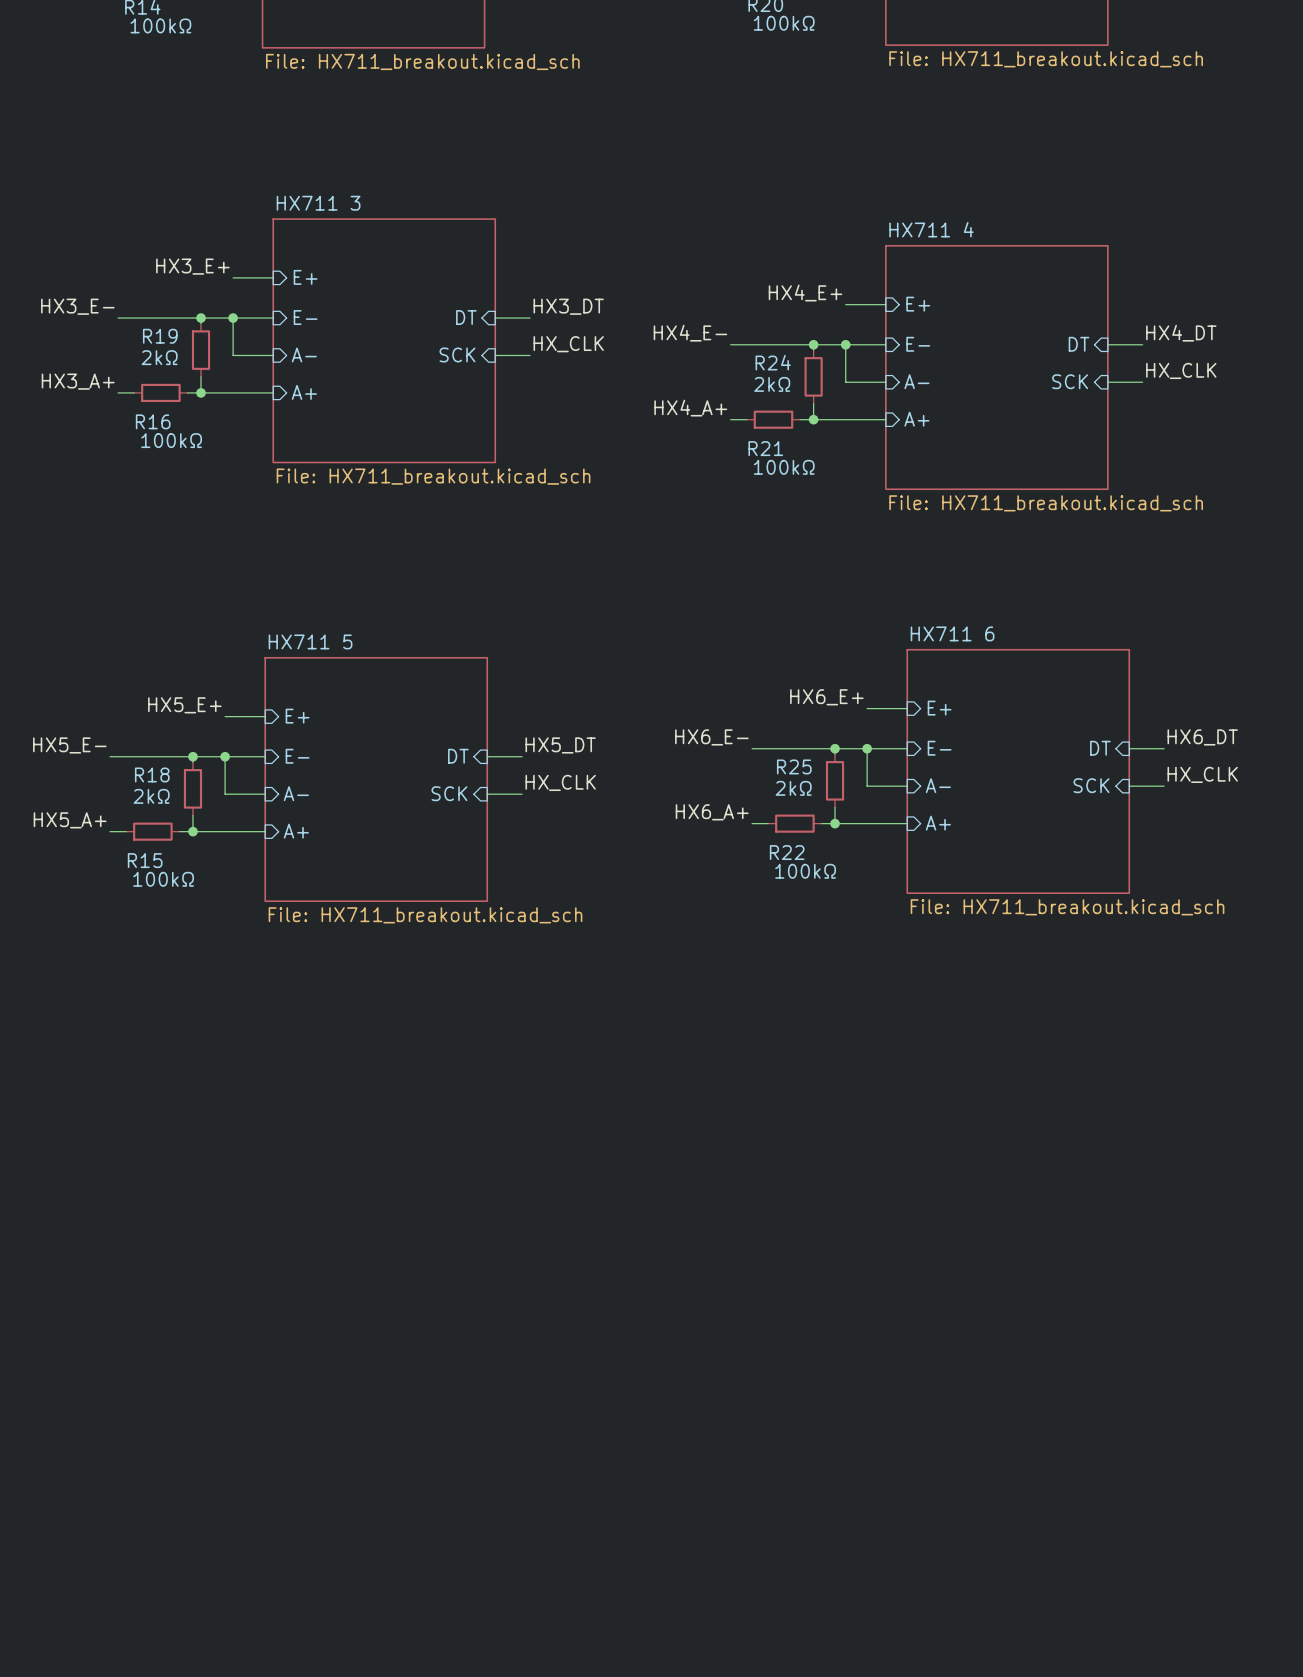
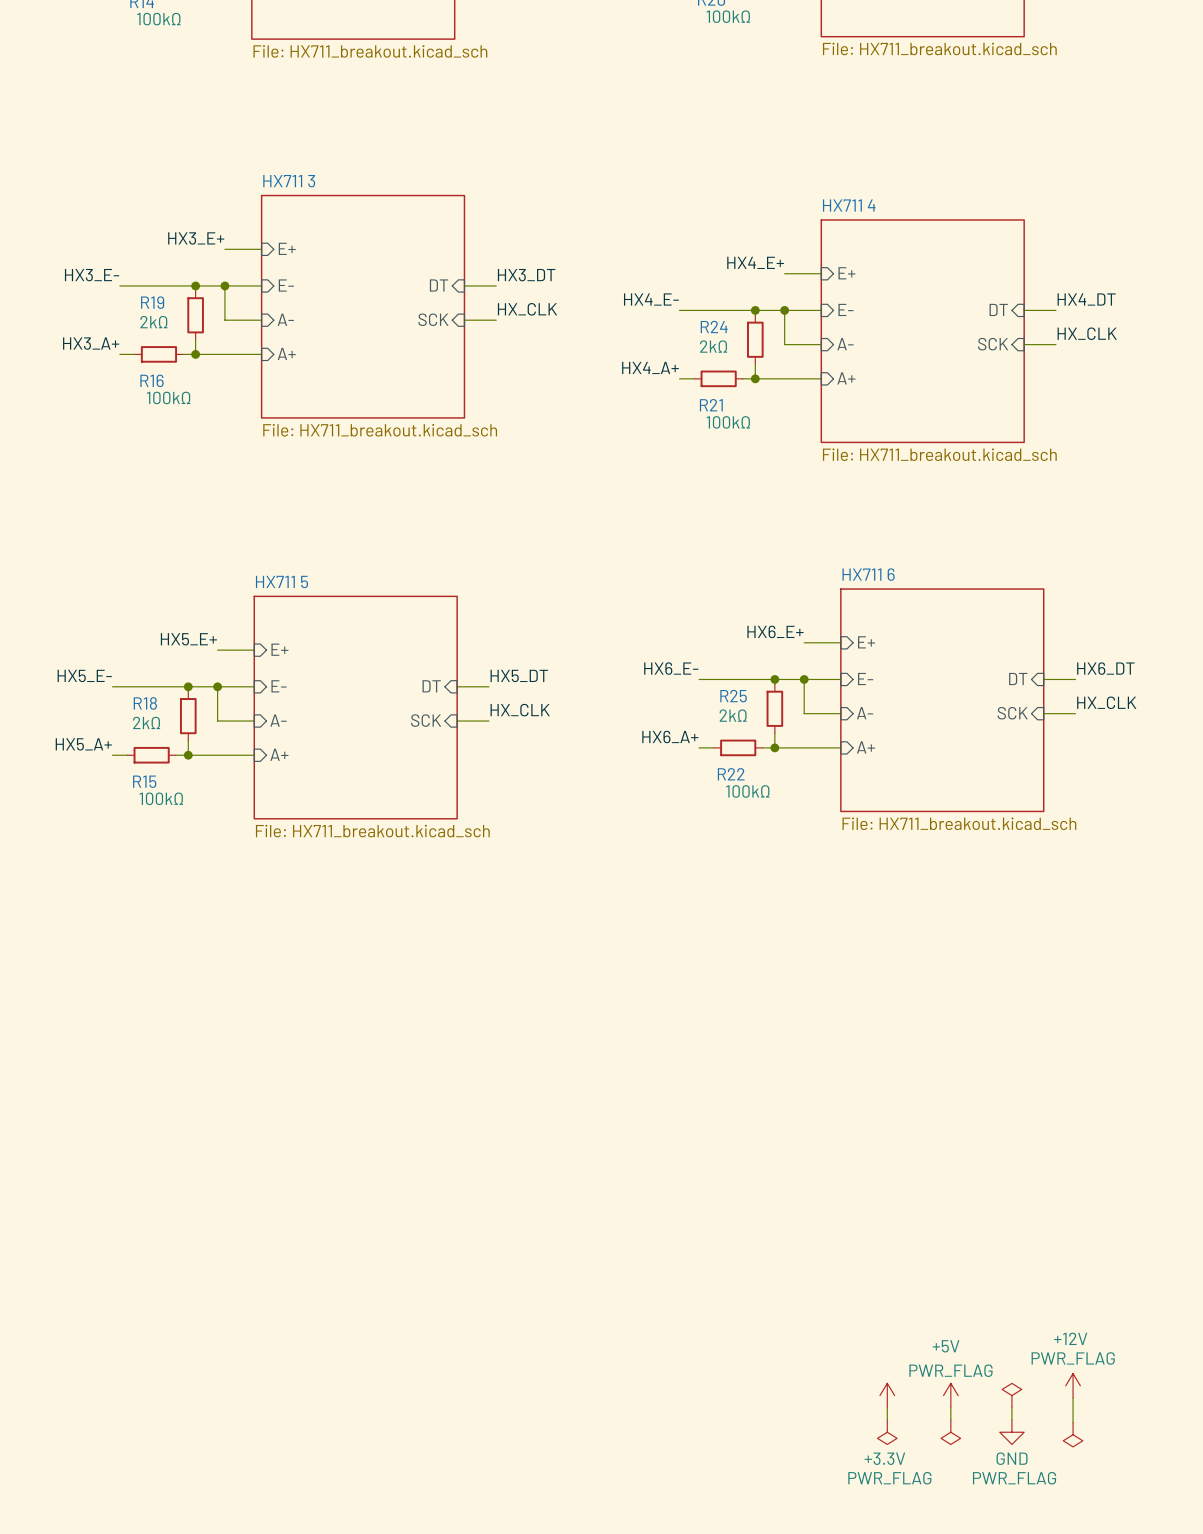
power symbol: none -> +12V (1073, 1385)
power symbol: none -> +3.3V (887, 1395)
power symbol: none -> +5V (950, 1395)
power symbol: none -> PWR_FLAG (1011, 1395)
wire: none -> (1073, 1398) (1073, 1422)
wire: none -> (887, 1407) (887, 1420)
wire: none -> (950, 1407) (950, 1420)
wire: none -> (1011, 1407) (1011, 1420)
power symbol: none -> PWR_FLAG (887, 1432)
power symbol: none -> PWR_FLAG (950, 1432)
power symbol: none -> GND (1011, 1432)
power symbol: none -> PWR_FLAG (1073, 1434)

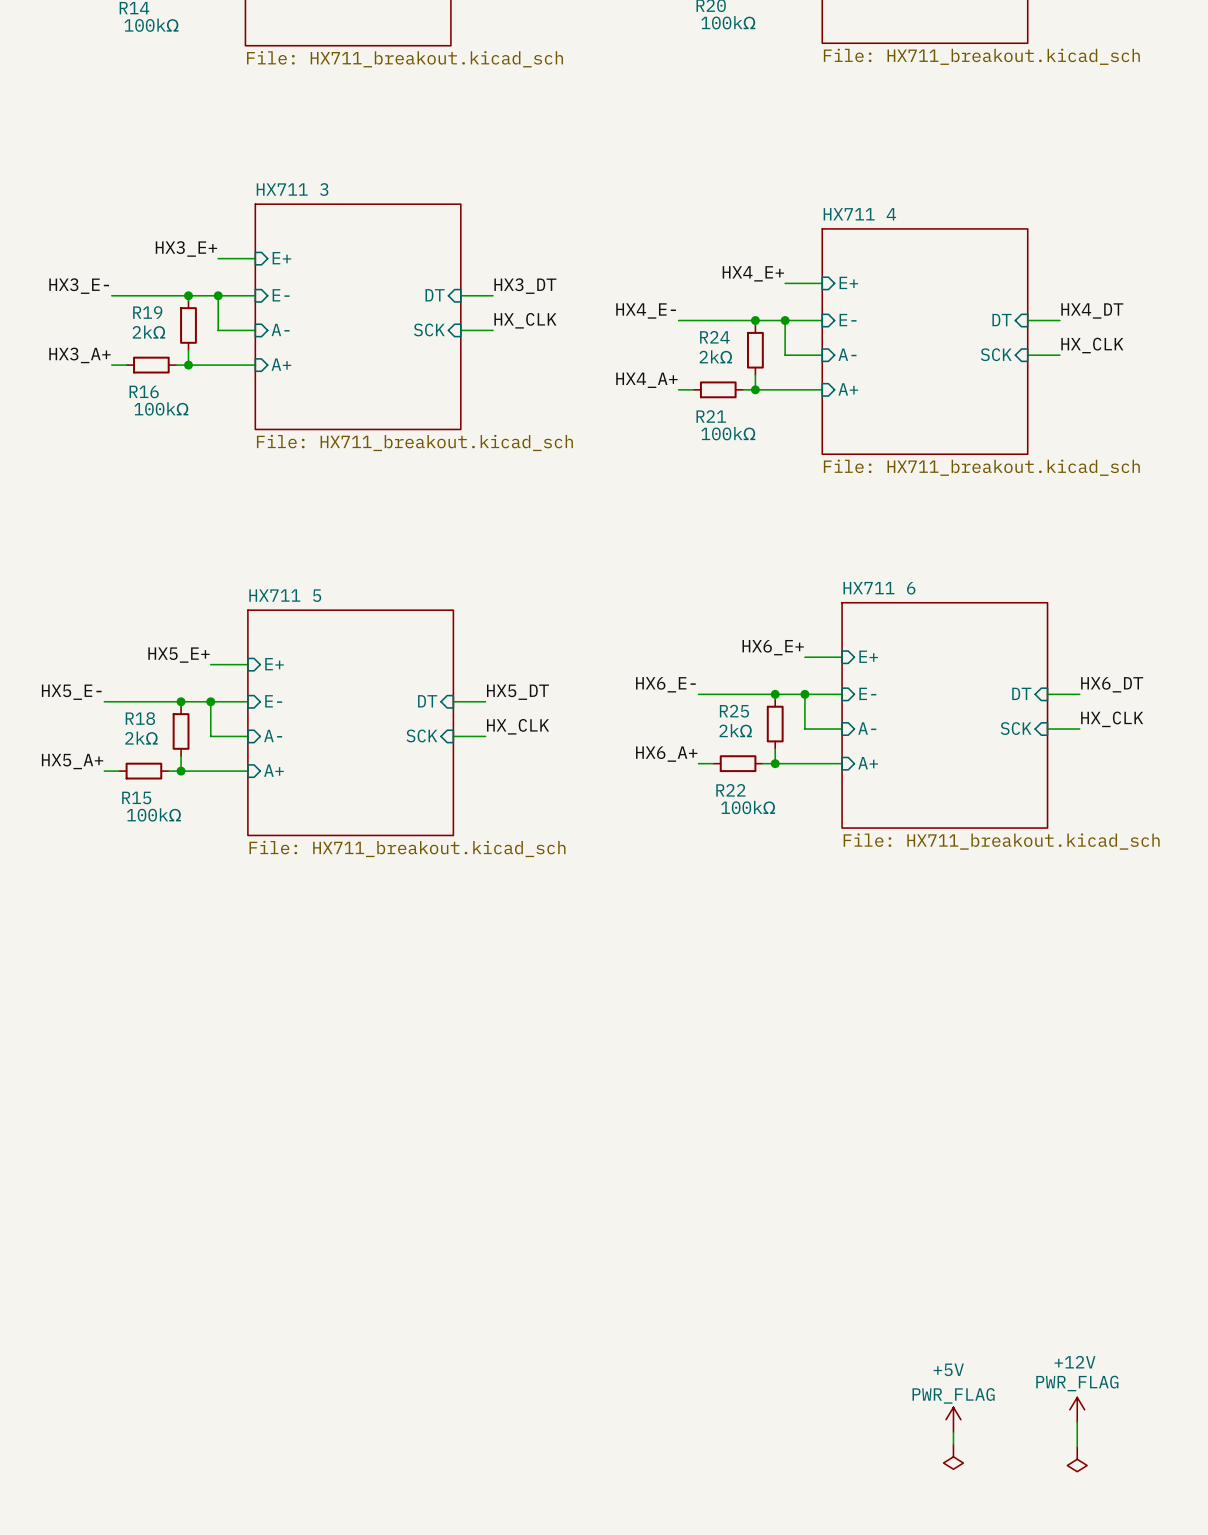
power symbol: +3.3V (887, 1395) -> none
power symbol: PWR_FLAG (1011, 1395) -> none
wire: (887, 1407) (887, 1420) -> none
wire: (1011, 1407) (1011, 1420) -> none
power symbol: PWR_FLAG (887, 1432) -> none
power symbol: GND (1011, 1432) -> none

